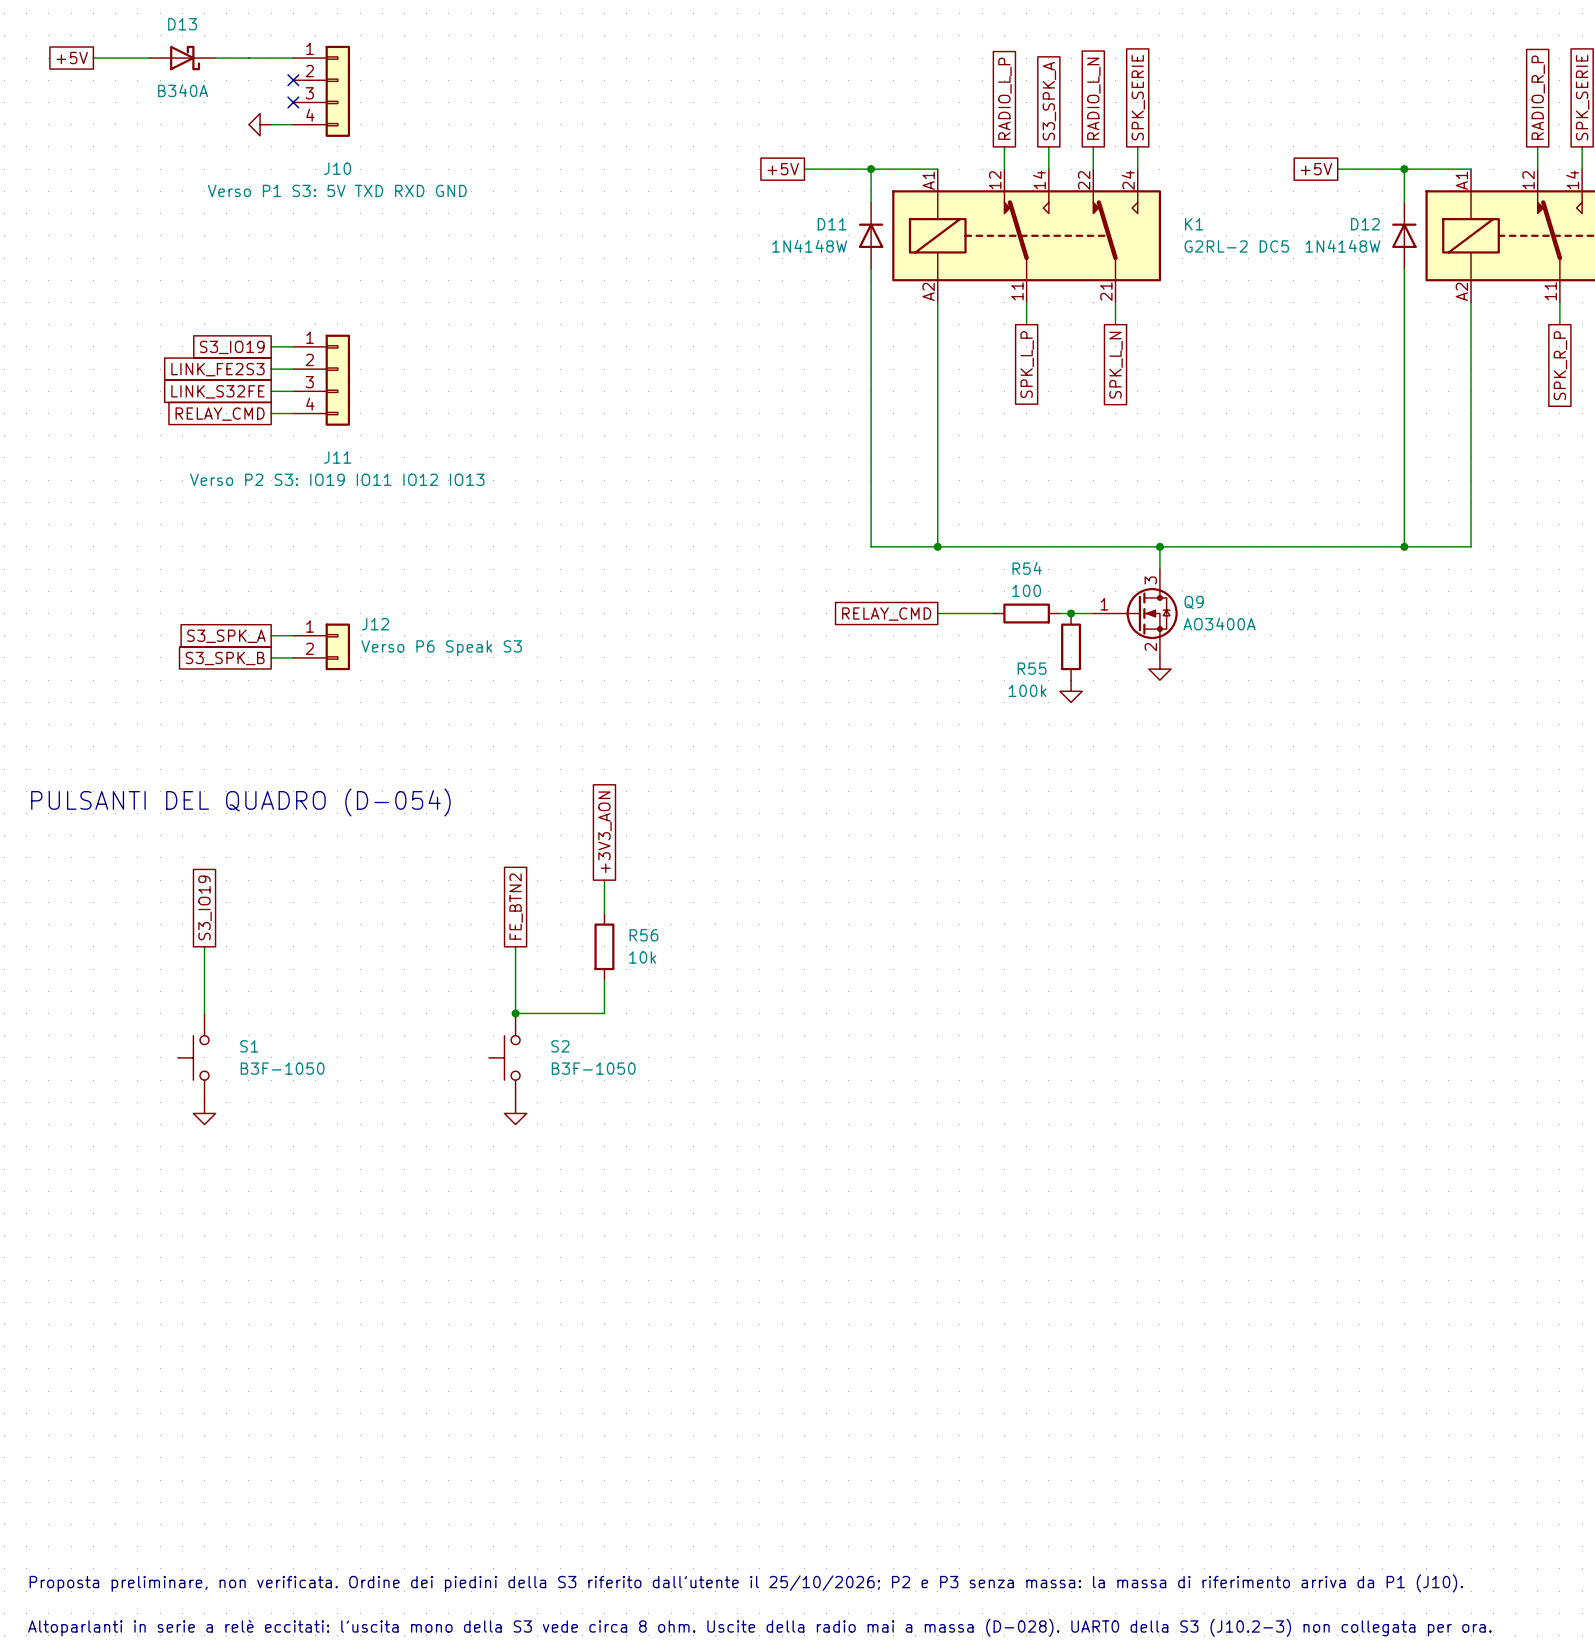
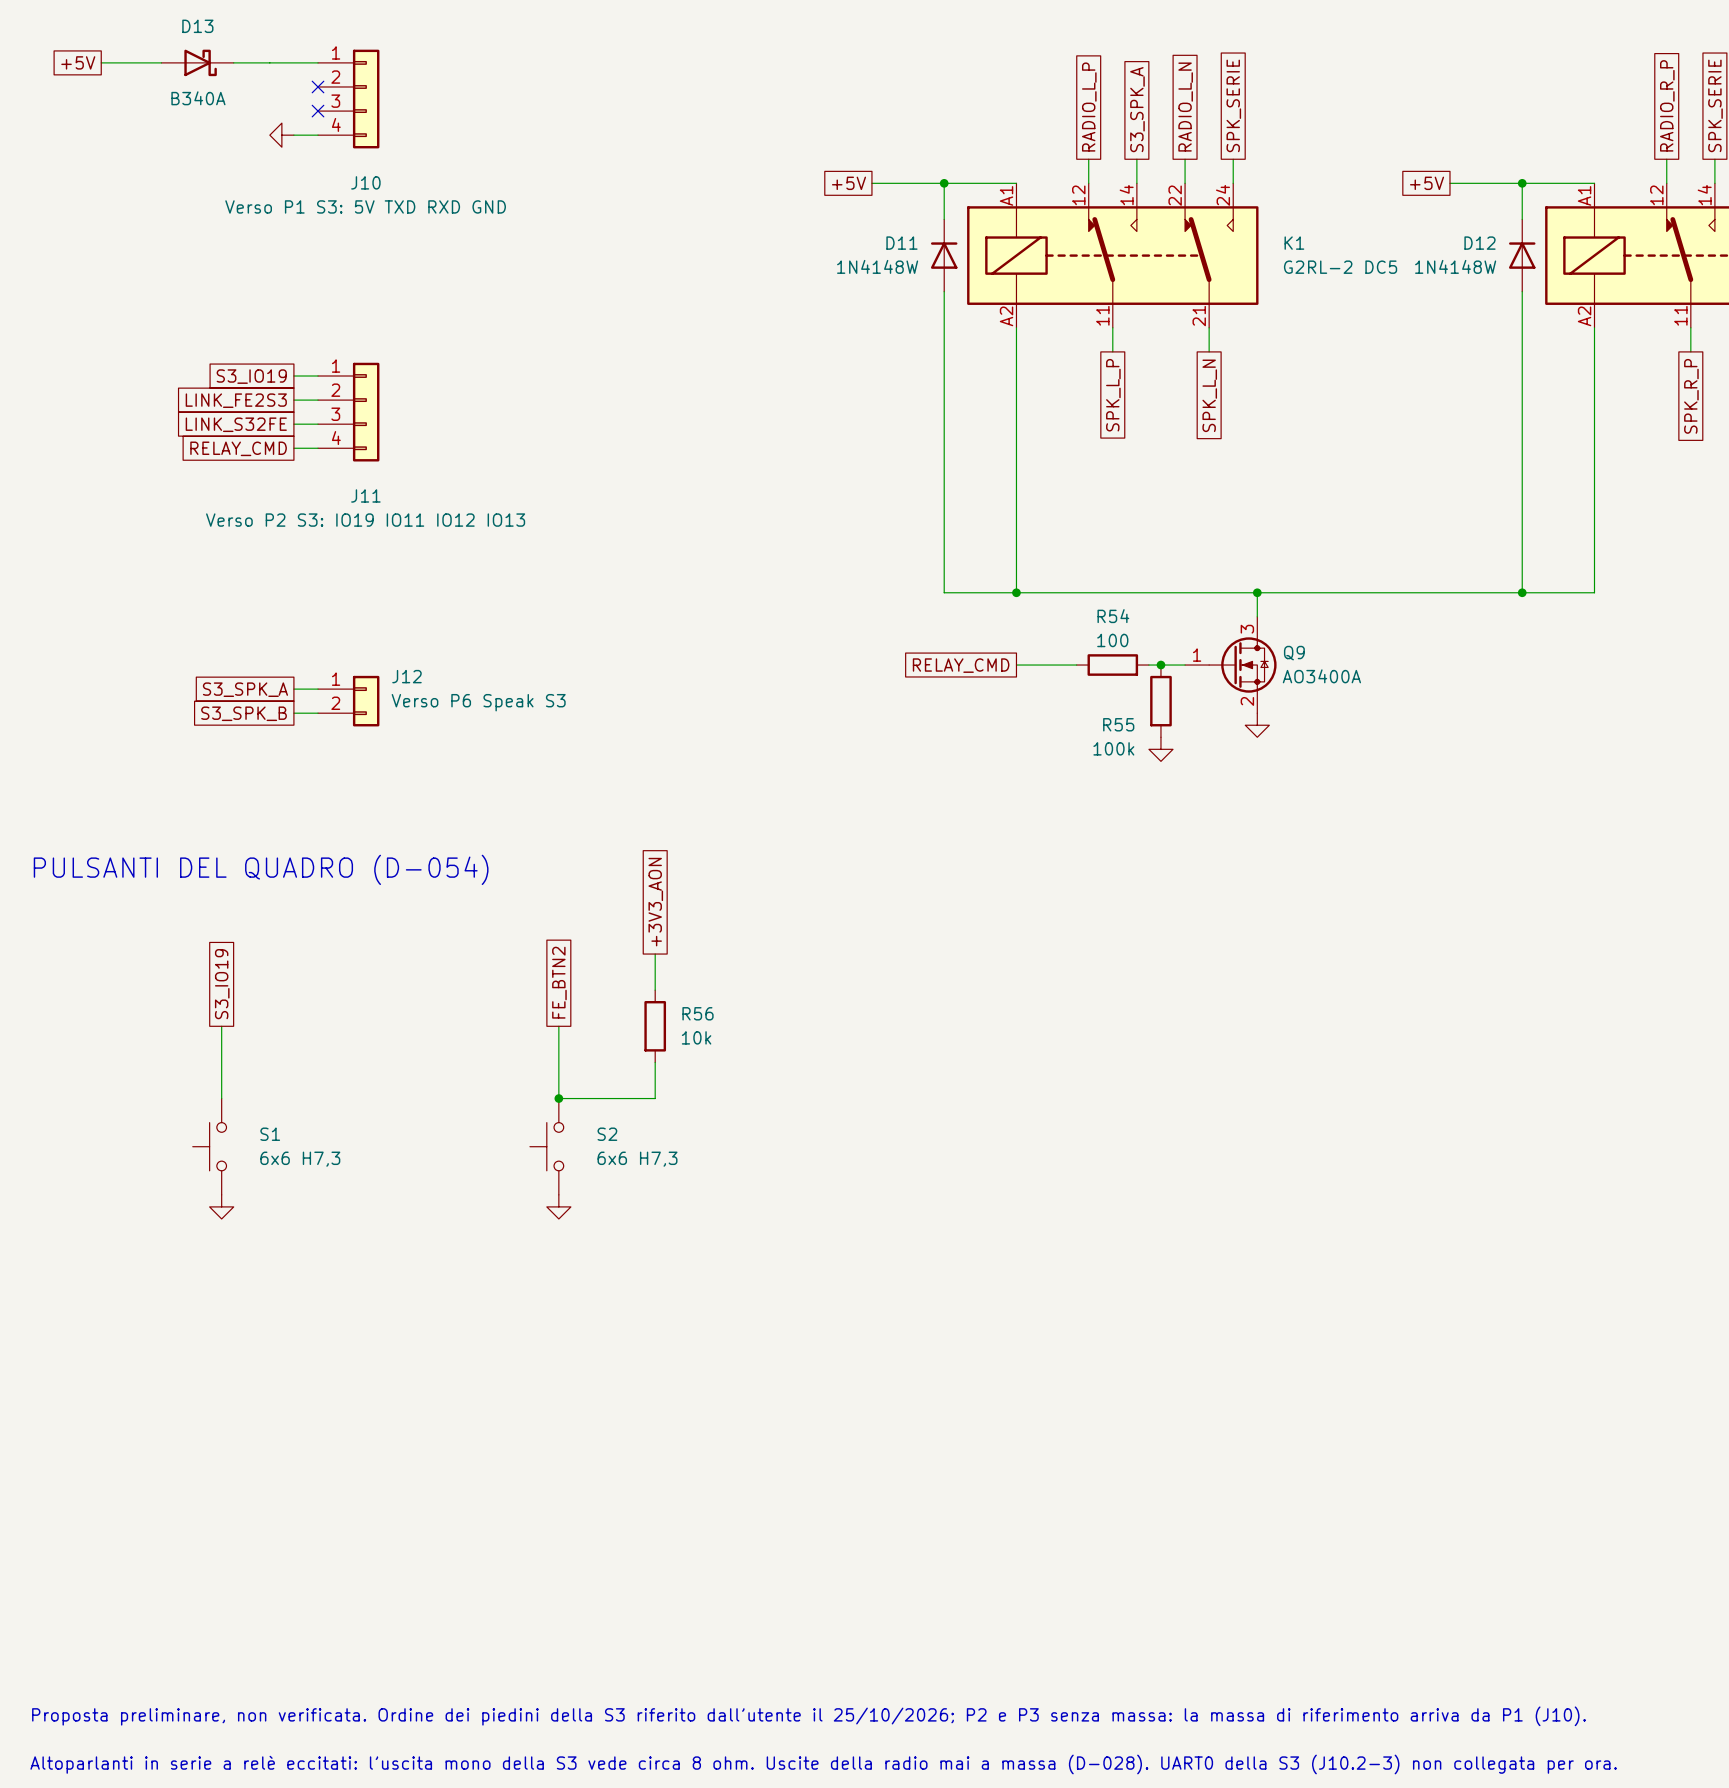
S1 value: B3F-1050 (282, 1068) -> 6x6 H7,3 (300, 1159)
S2 value: B3F-1050 (593, 1068) -> 6x6 H7,3 (637, 1159)

